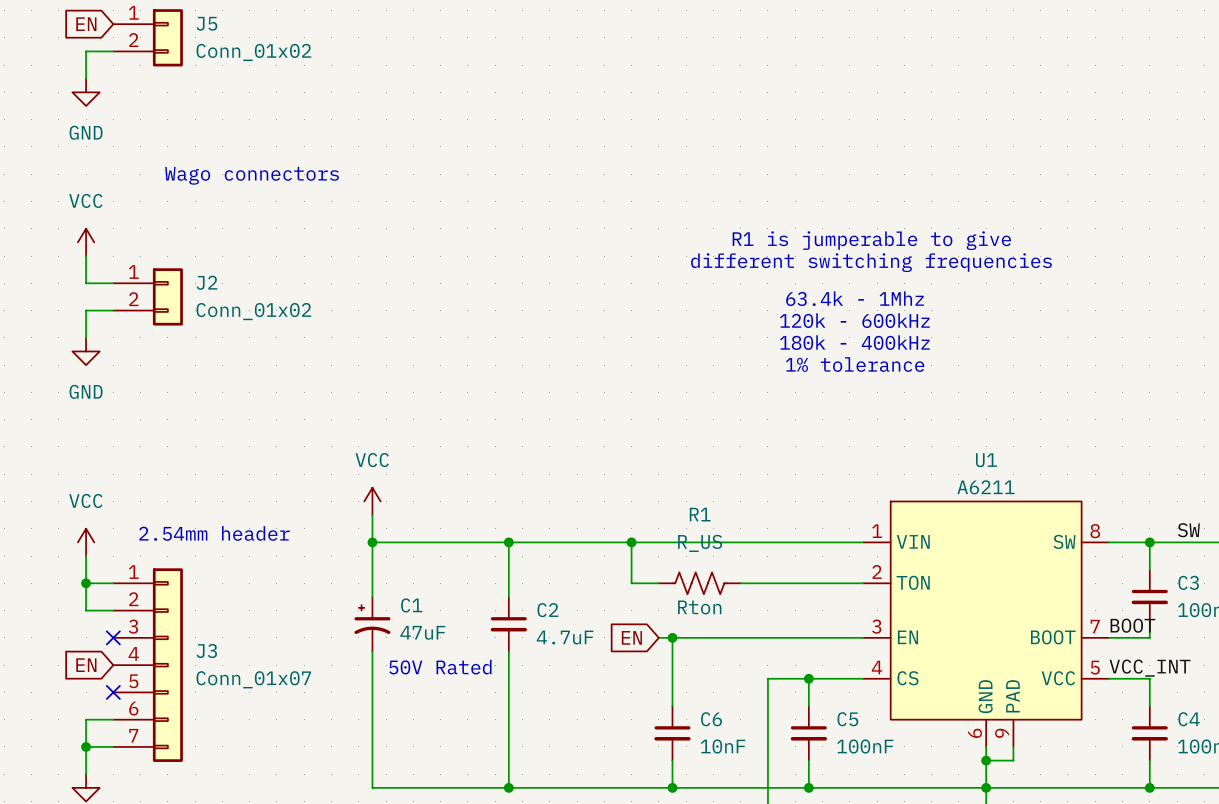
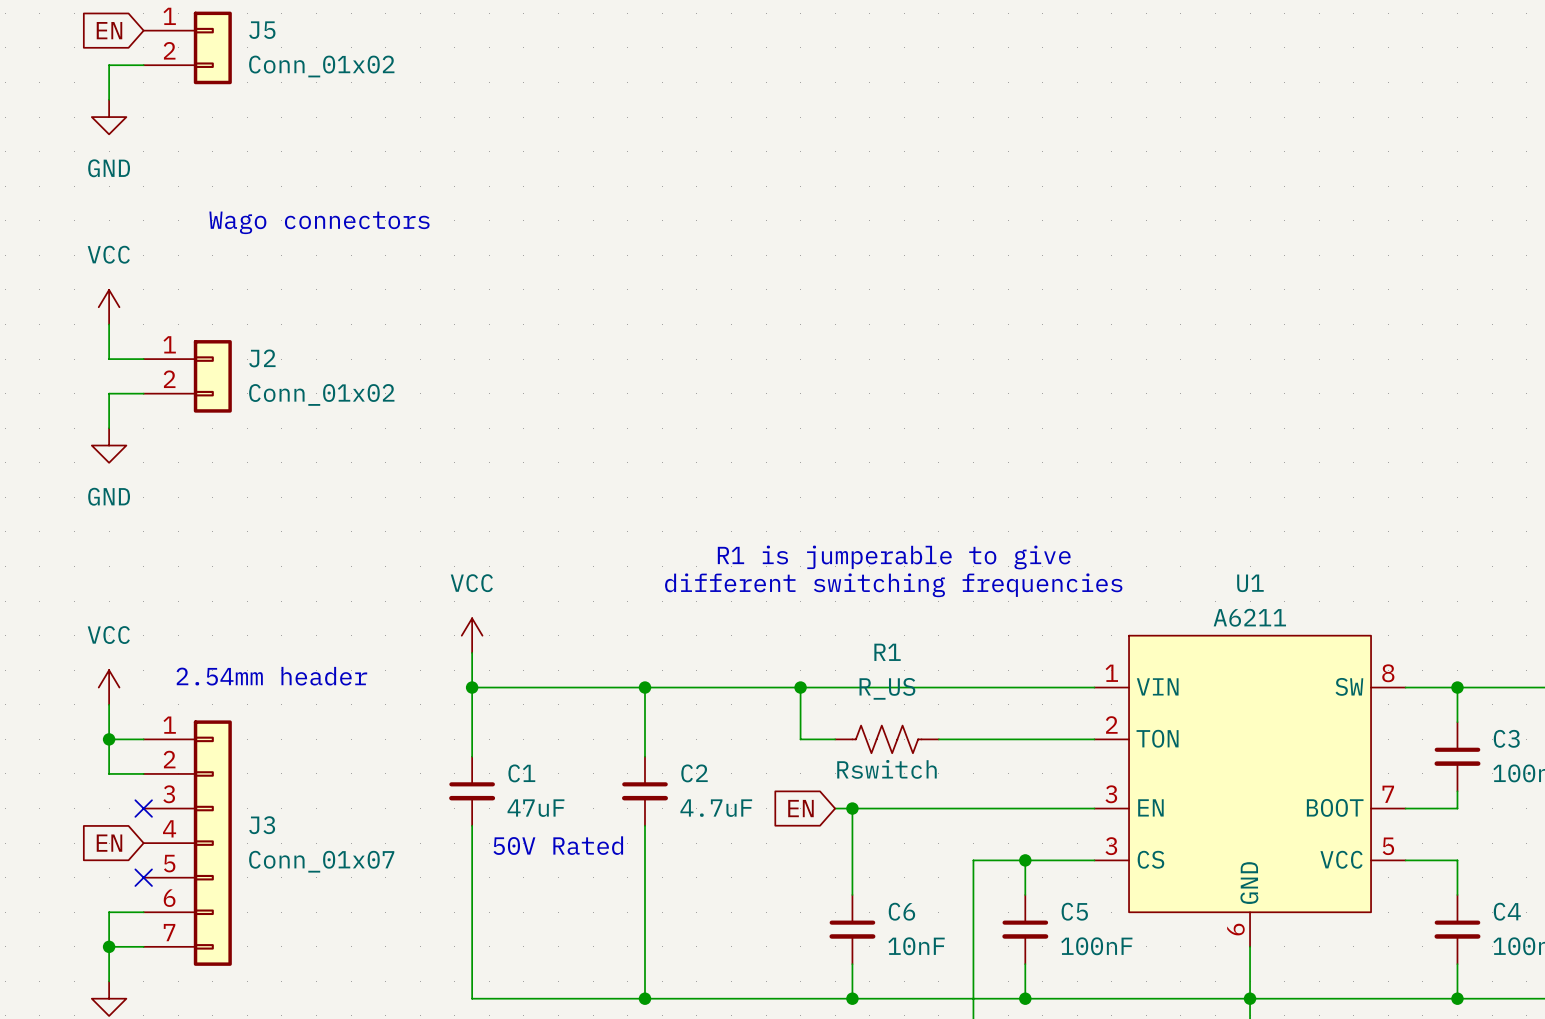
text position: R1 is jumperable to give (871, 240) -> R1 is jumperable to give (894, 557)
text position: different switching frequencies (871, 262) -> different switching frequencies (893, 585)
text: 63.4k - 1Mhz (855, 298) -> none
text: 120k - 600kHz (854, 320) -> none
text: 180k - 400kHz (854, 342) -> none
text: 1% tolerance (855, 364) -> none
U1 symbol: [863, 501, 1109, 747] -> [1094, 635, 1406, 947]
label: SW (1188, 530) -> none
C1 symbol: [354, 596, 391, 652] -> [449, 756, 496, 826]
R1 text: Rton (699, 607) -> Rswitch (886, 769)
label: BOOT (1132, 625) -> none
label: VCC_INT (1150, 668) -> none
wire: (1013, 746) (1013, 760) (986, 760) -> none
junction: (986, 760) -> none

